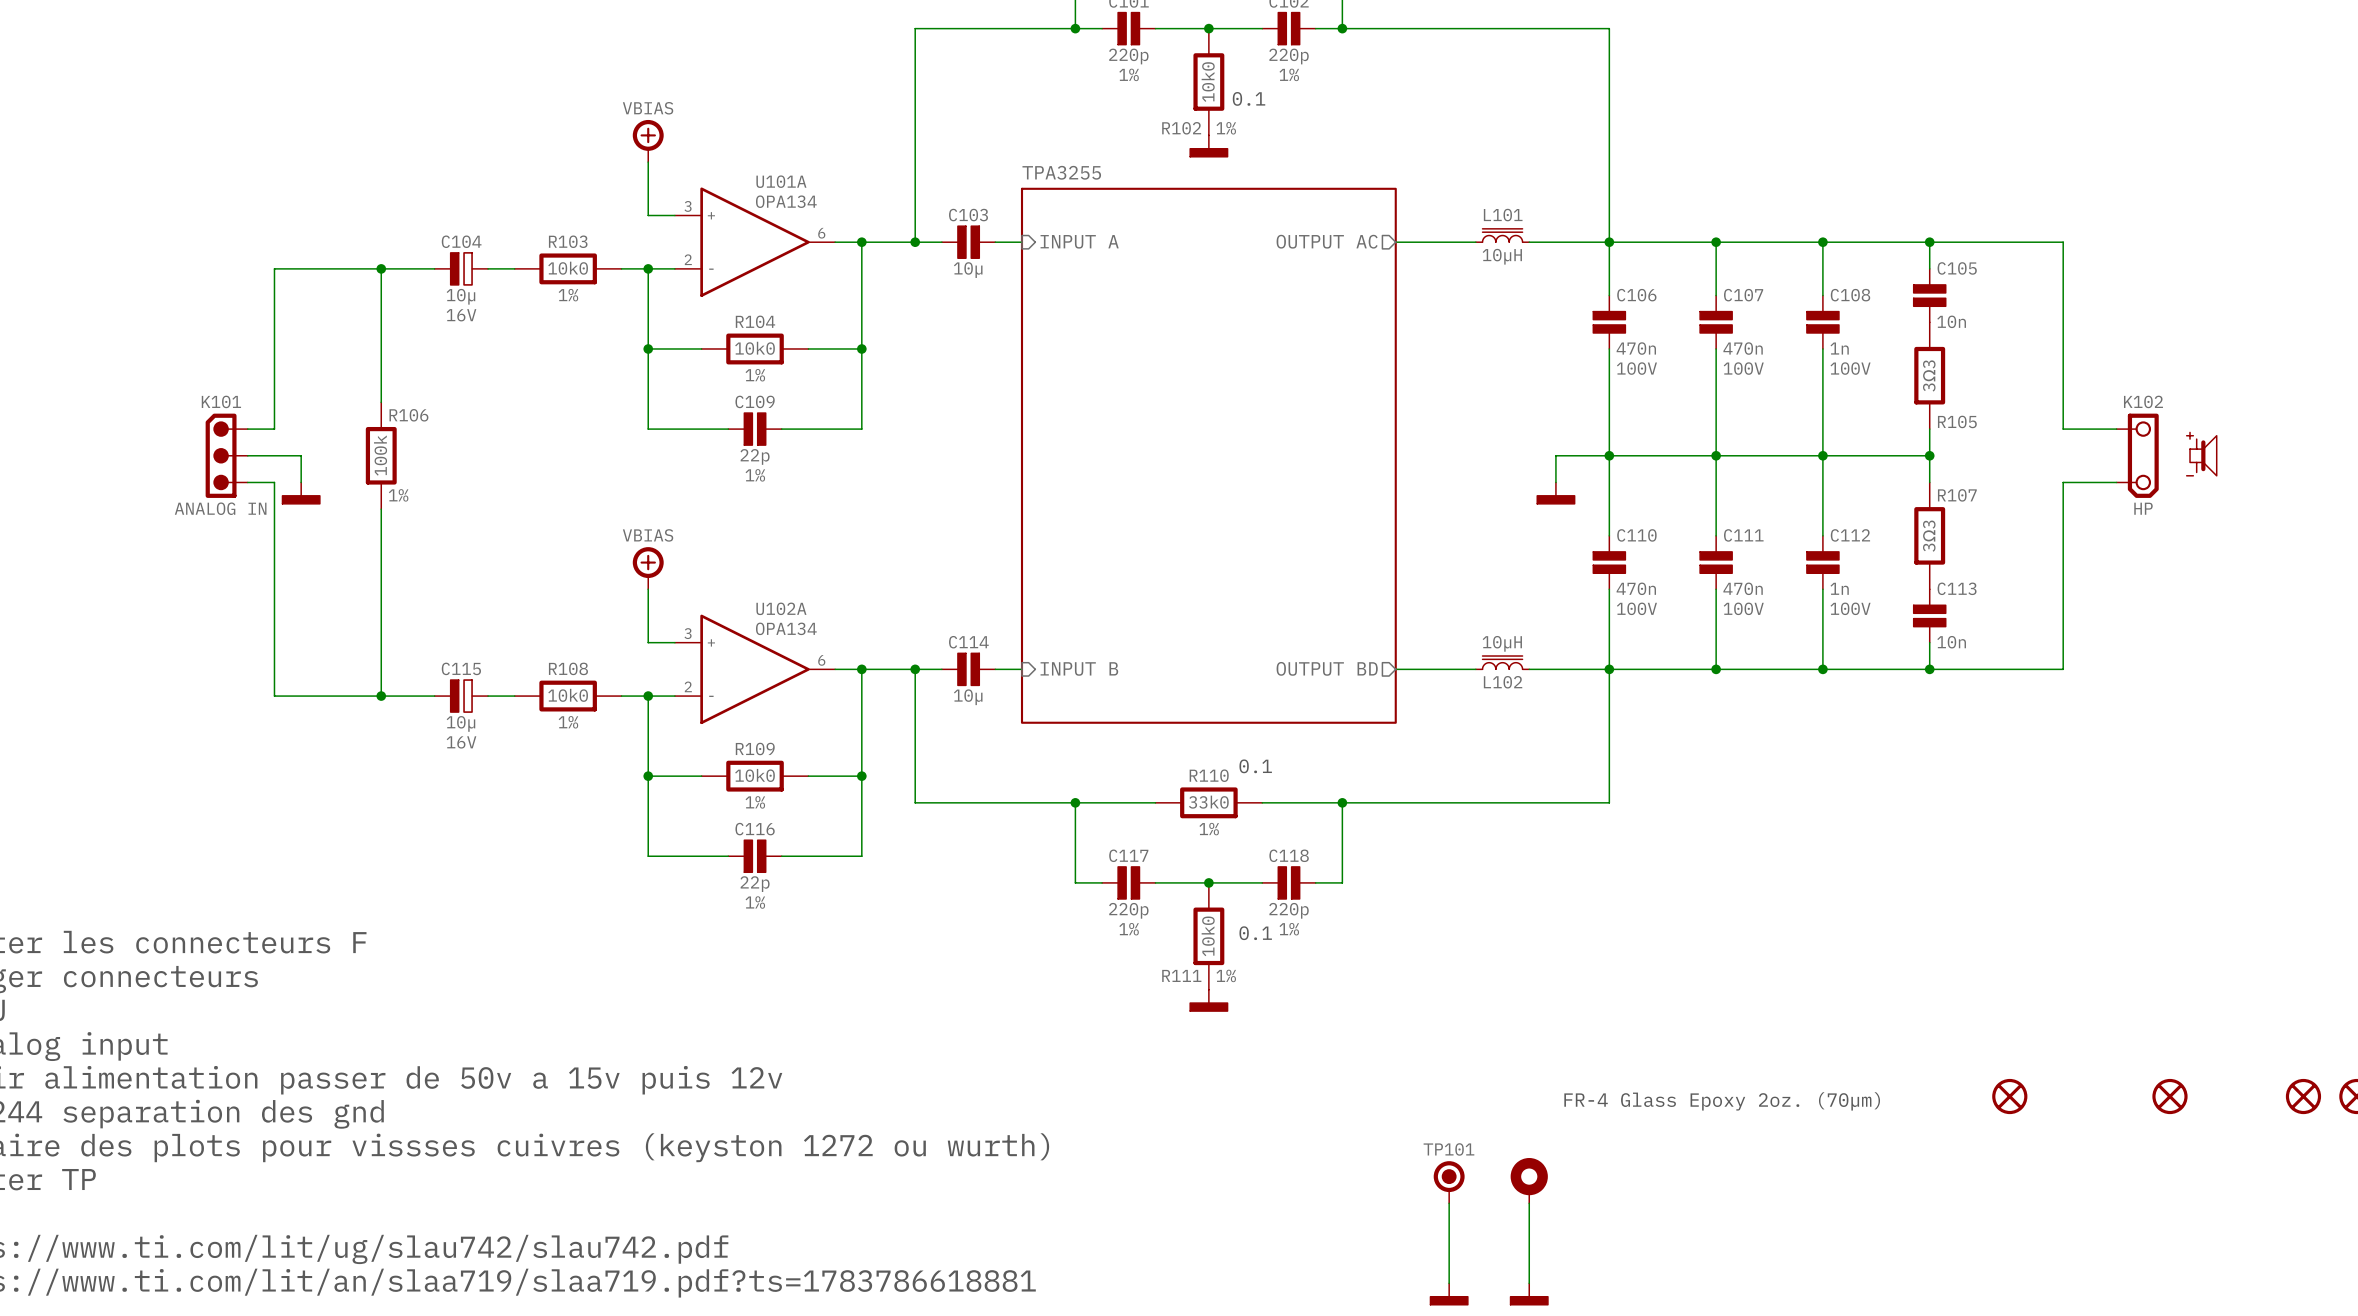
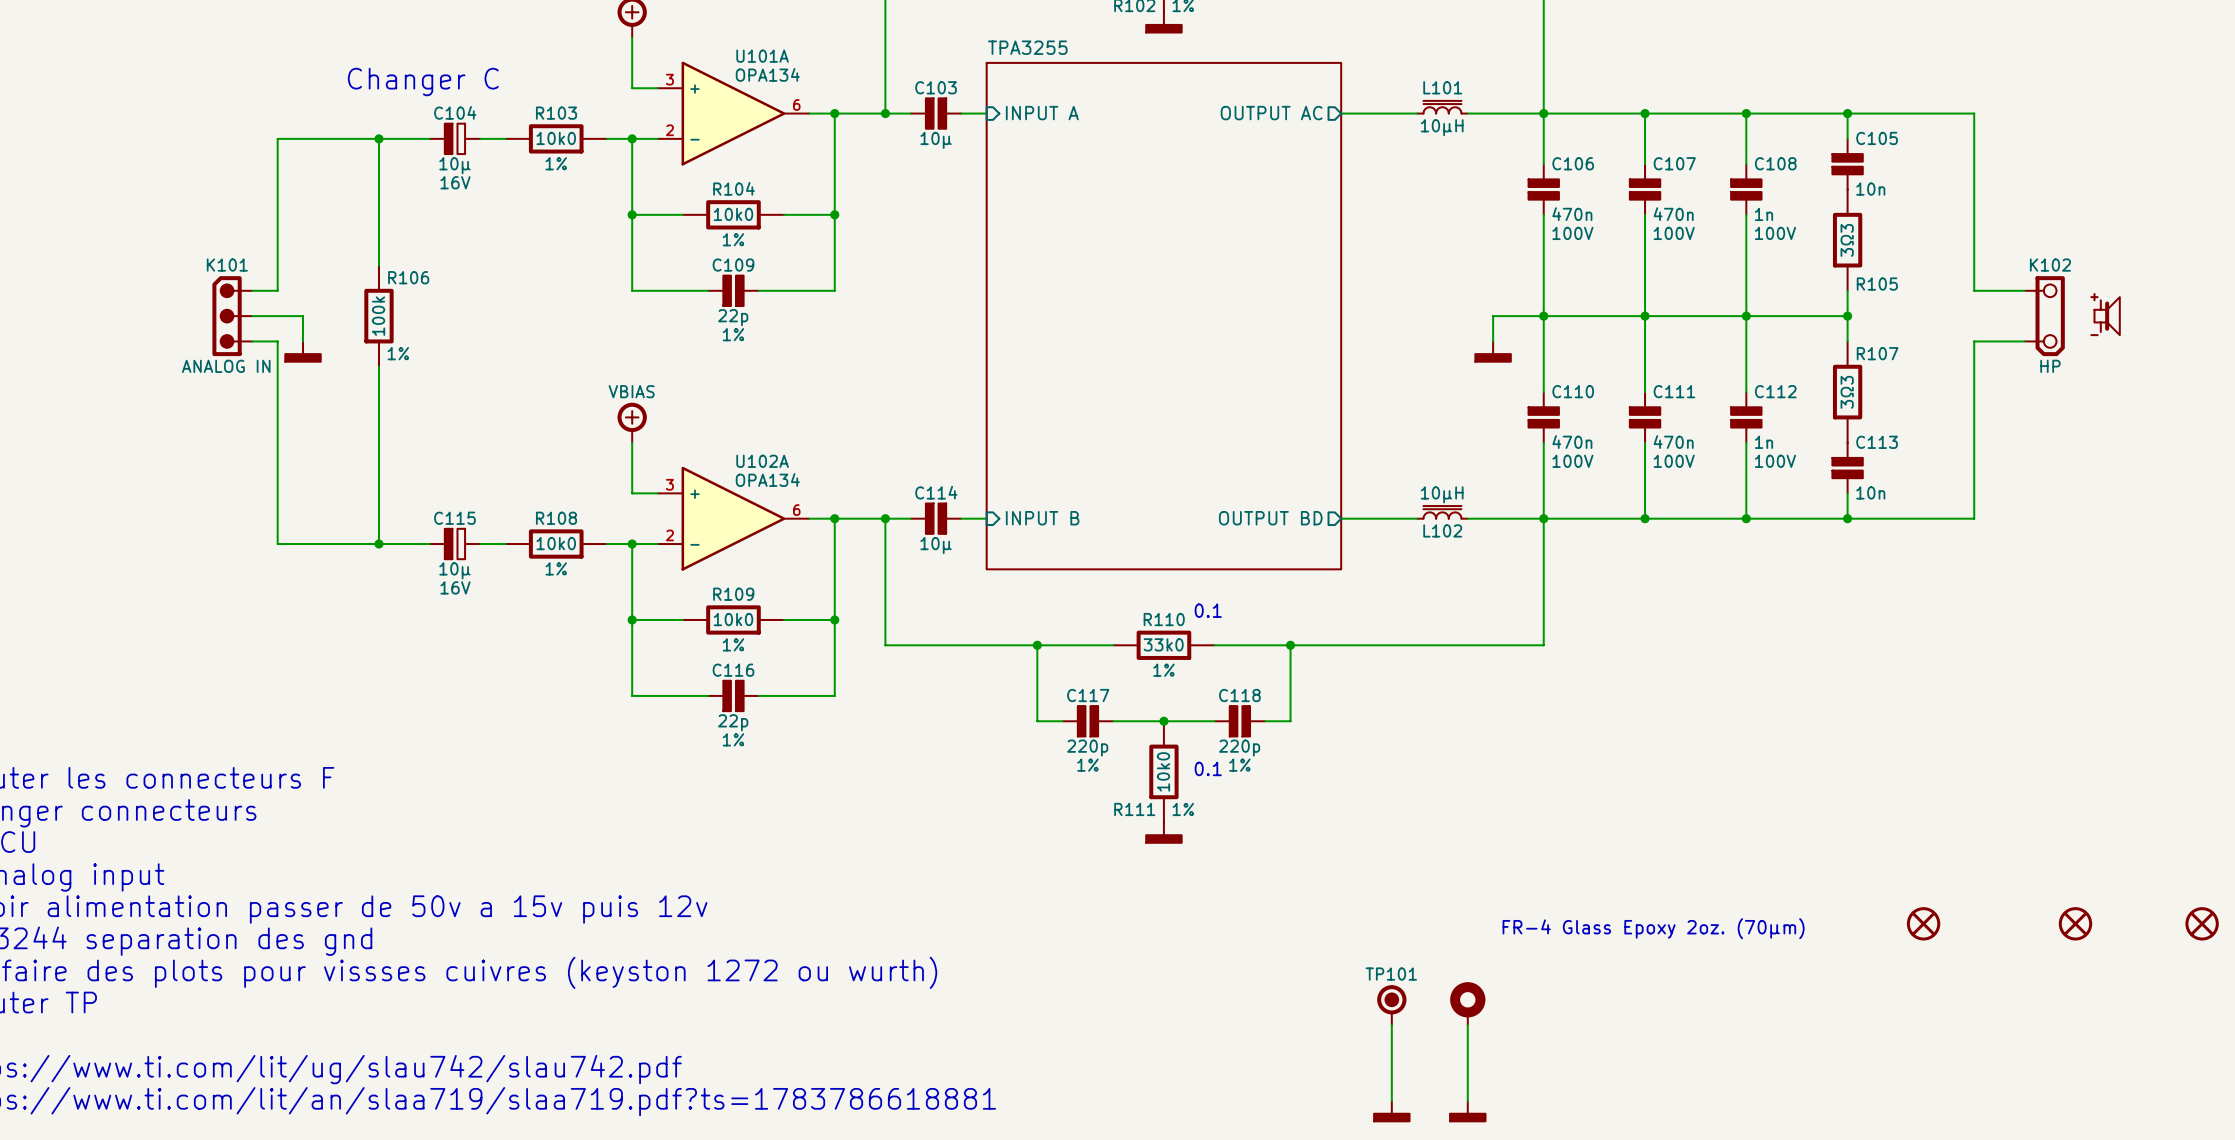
text: none -> Changer C (423, 81)

